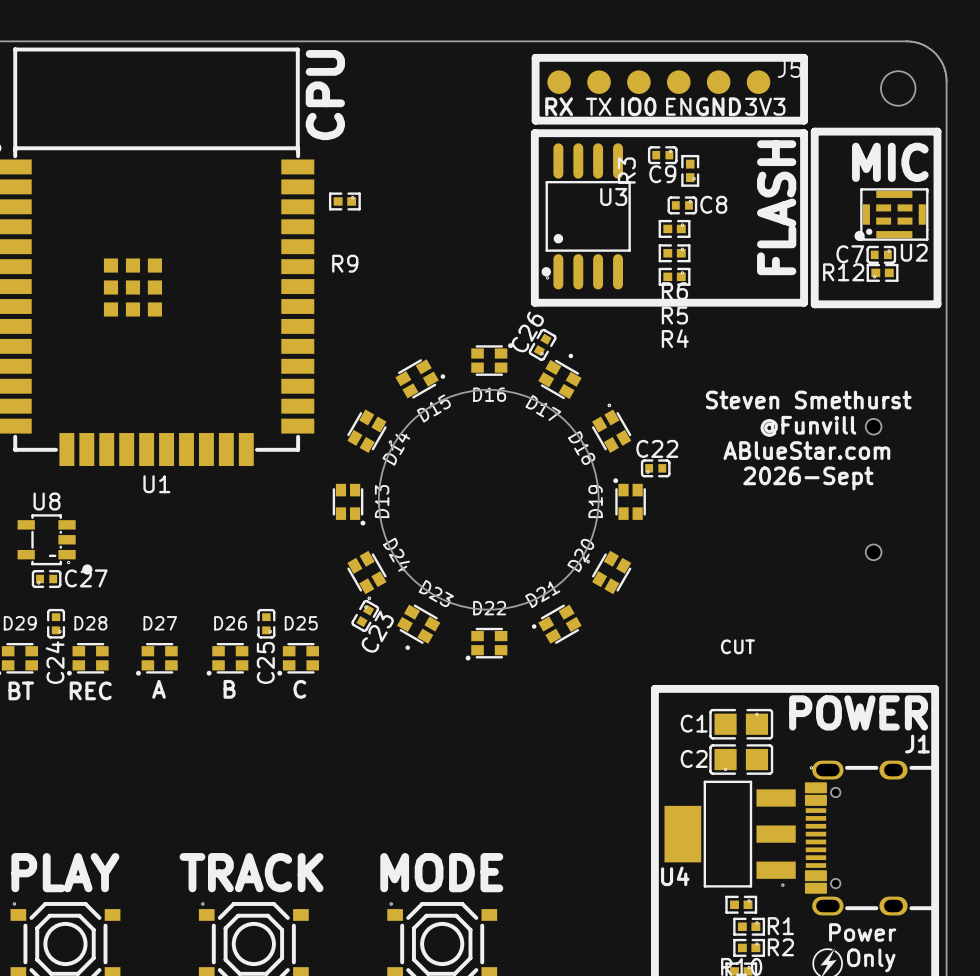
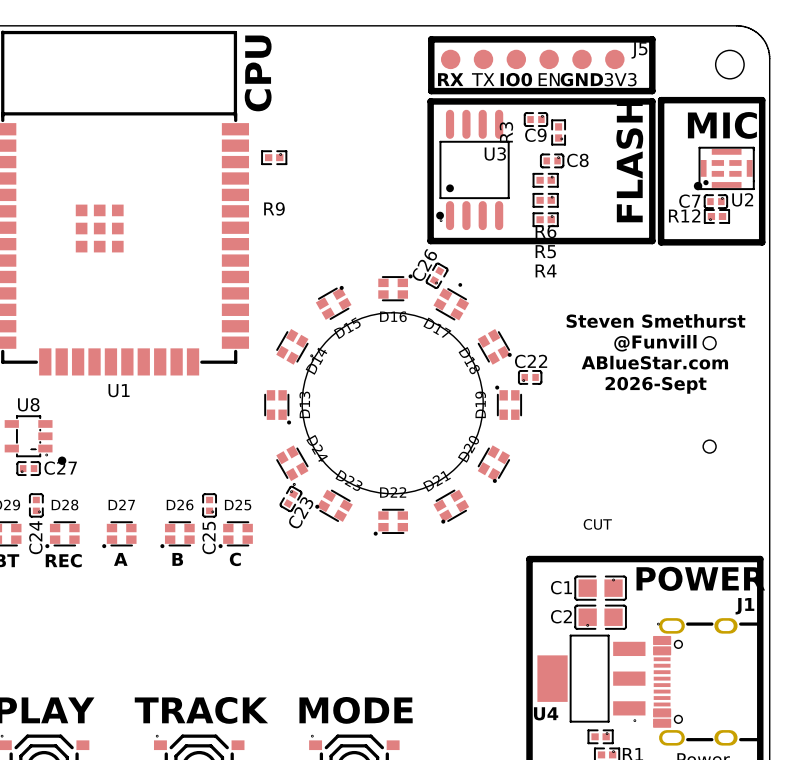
D15 footprint: [395, 359, 446, 399] -> [315, 285, 352, 320]
D18 footprint: [591, 403, 632, 453] -> [477, 328, 512, 365]
D20 footprint: [586, 550, 632, 595] -> [477, 445, 511, 483]
D23 footprint: [396, 604, 441, 650] -> [315, 489, 353, 523]
D21 footprint: [531, 604, 582, 644] -> [433, 489, 470, 524]

